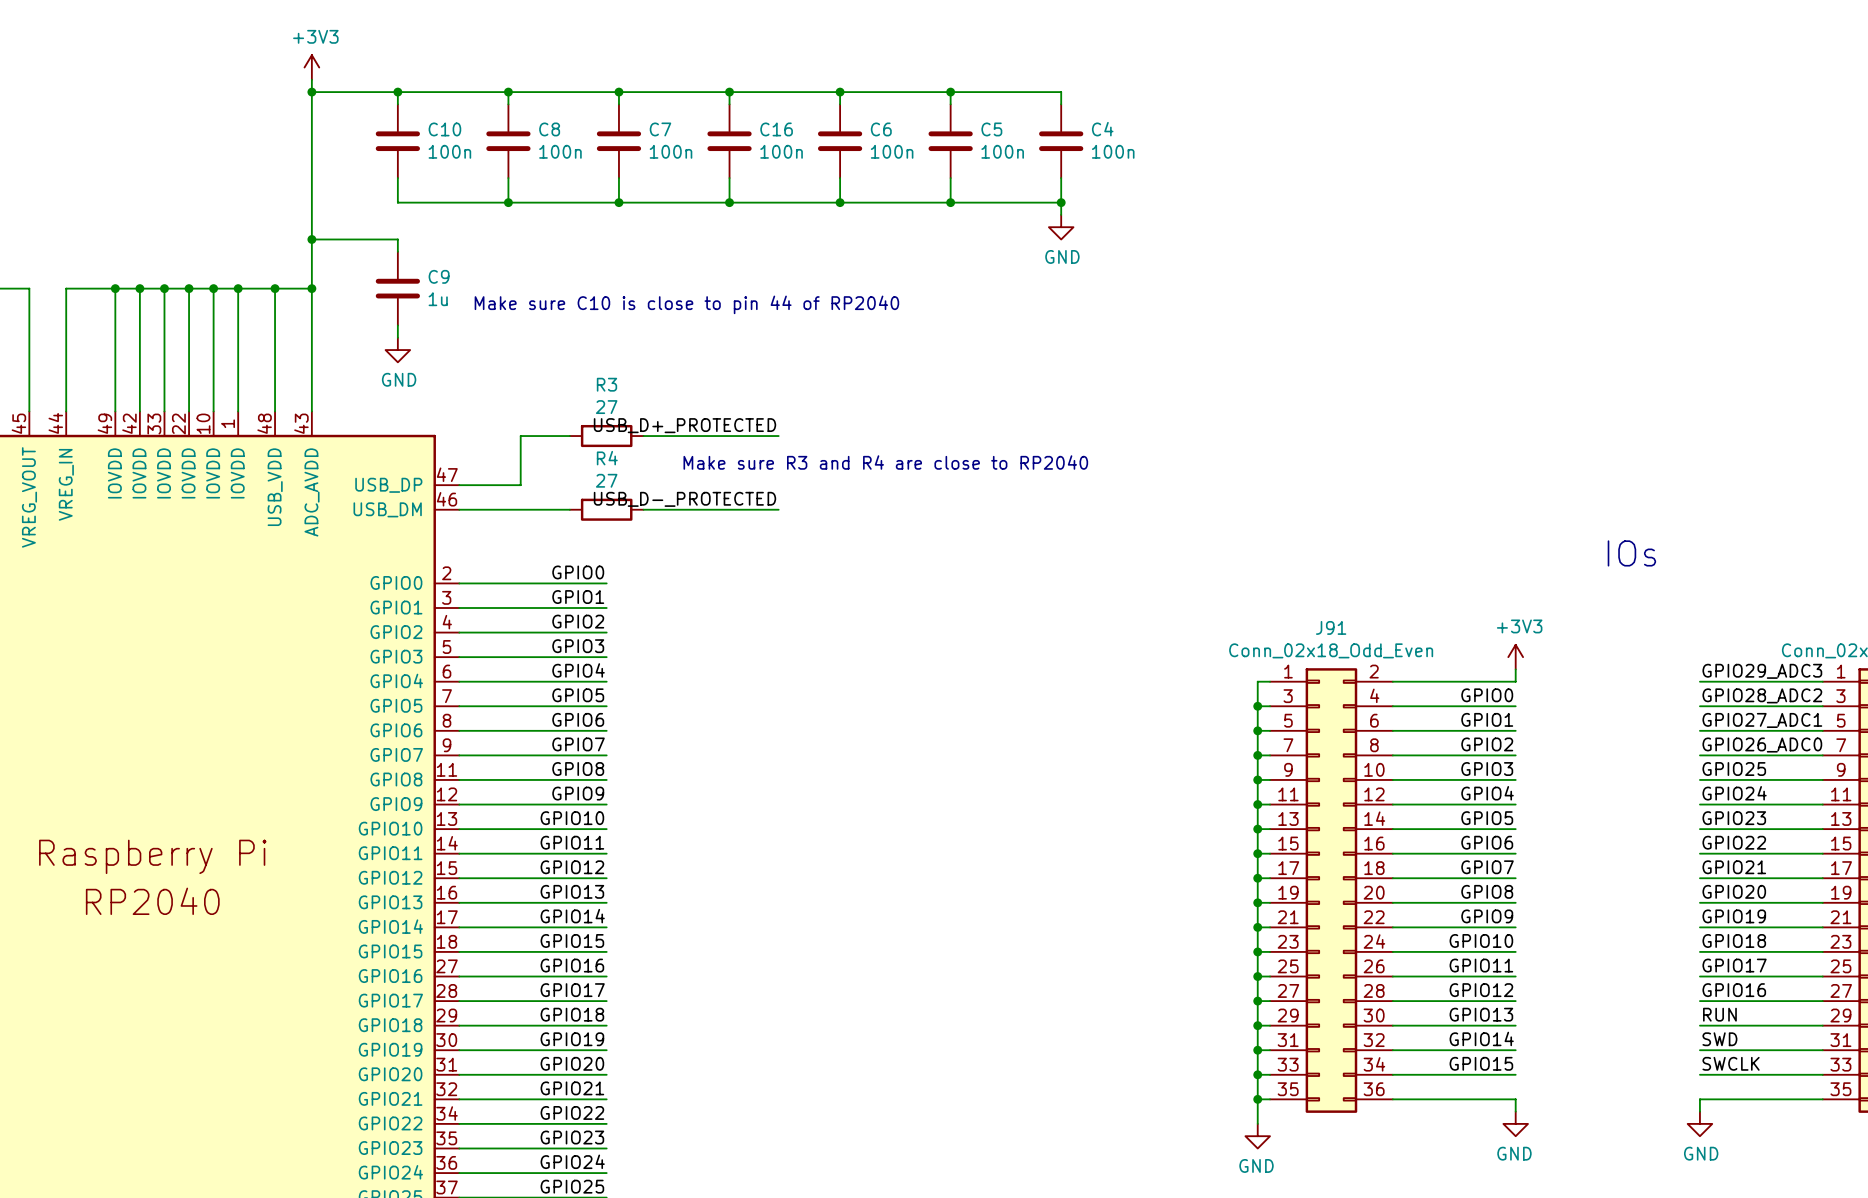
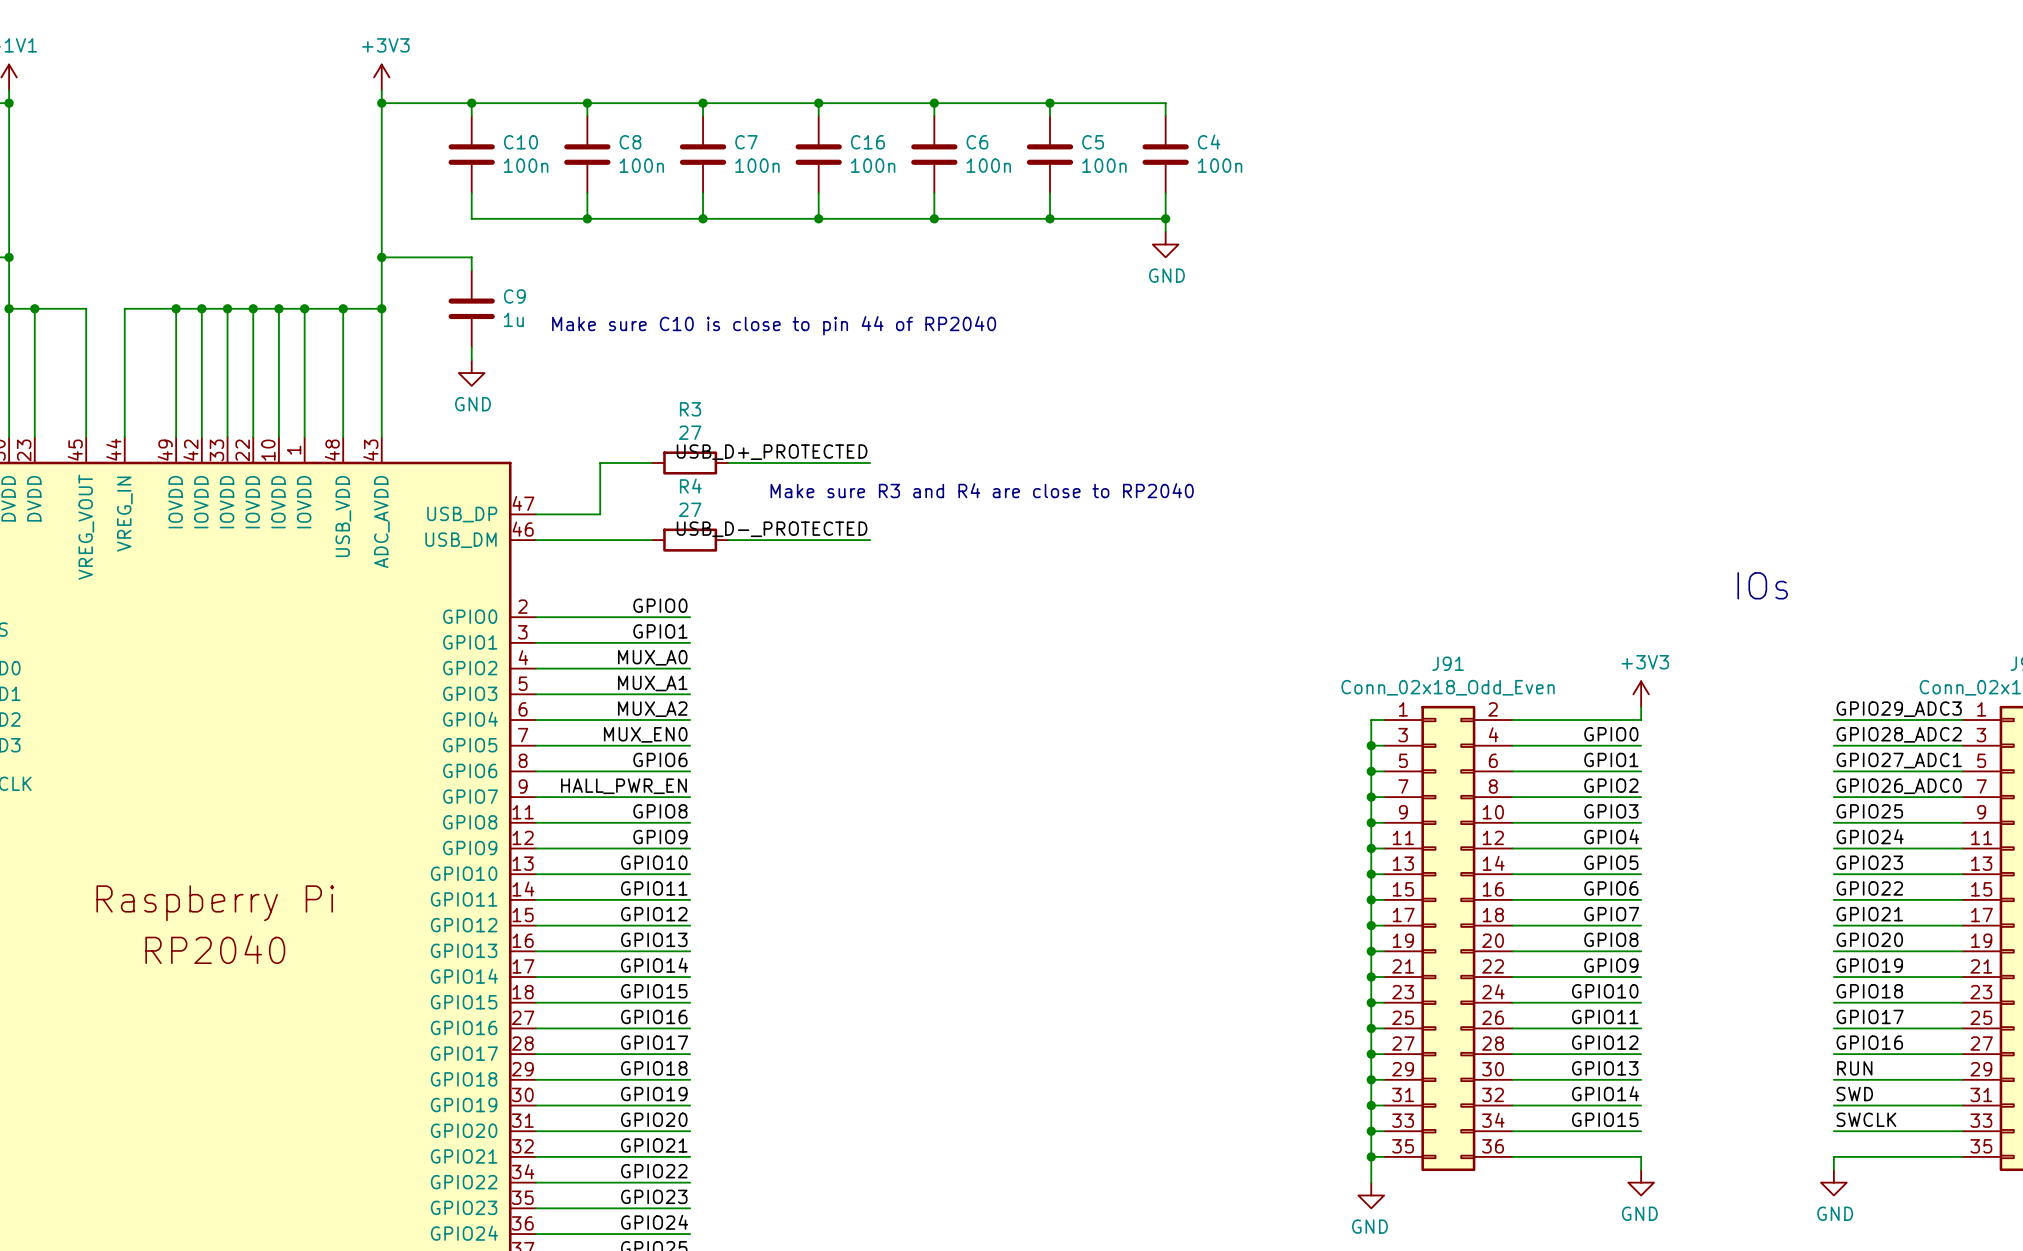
label: GPIO2 (578, 621) -> MUX_A0 (652, 657)
label: GPIO3 (578, 646) -> MUX_A1 (652, 683)
label: GPIO4 (578, 670) -> MUX_A2 (652, 709)
label: GPIO5 (578, 695) -> MUX_EN0 (645, 734)
label: GPIO7 (578, 744) -> HALL_PWR_EN (623, 786)

